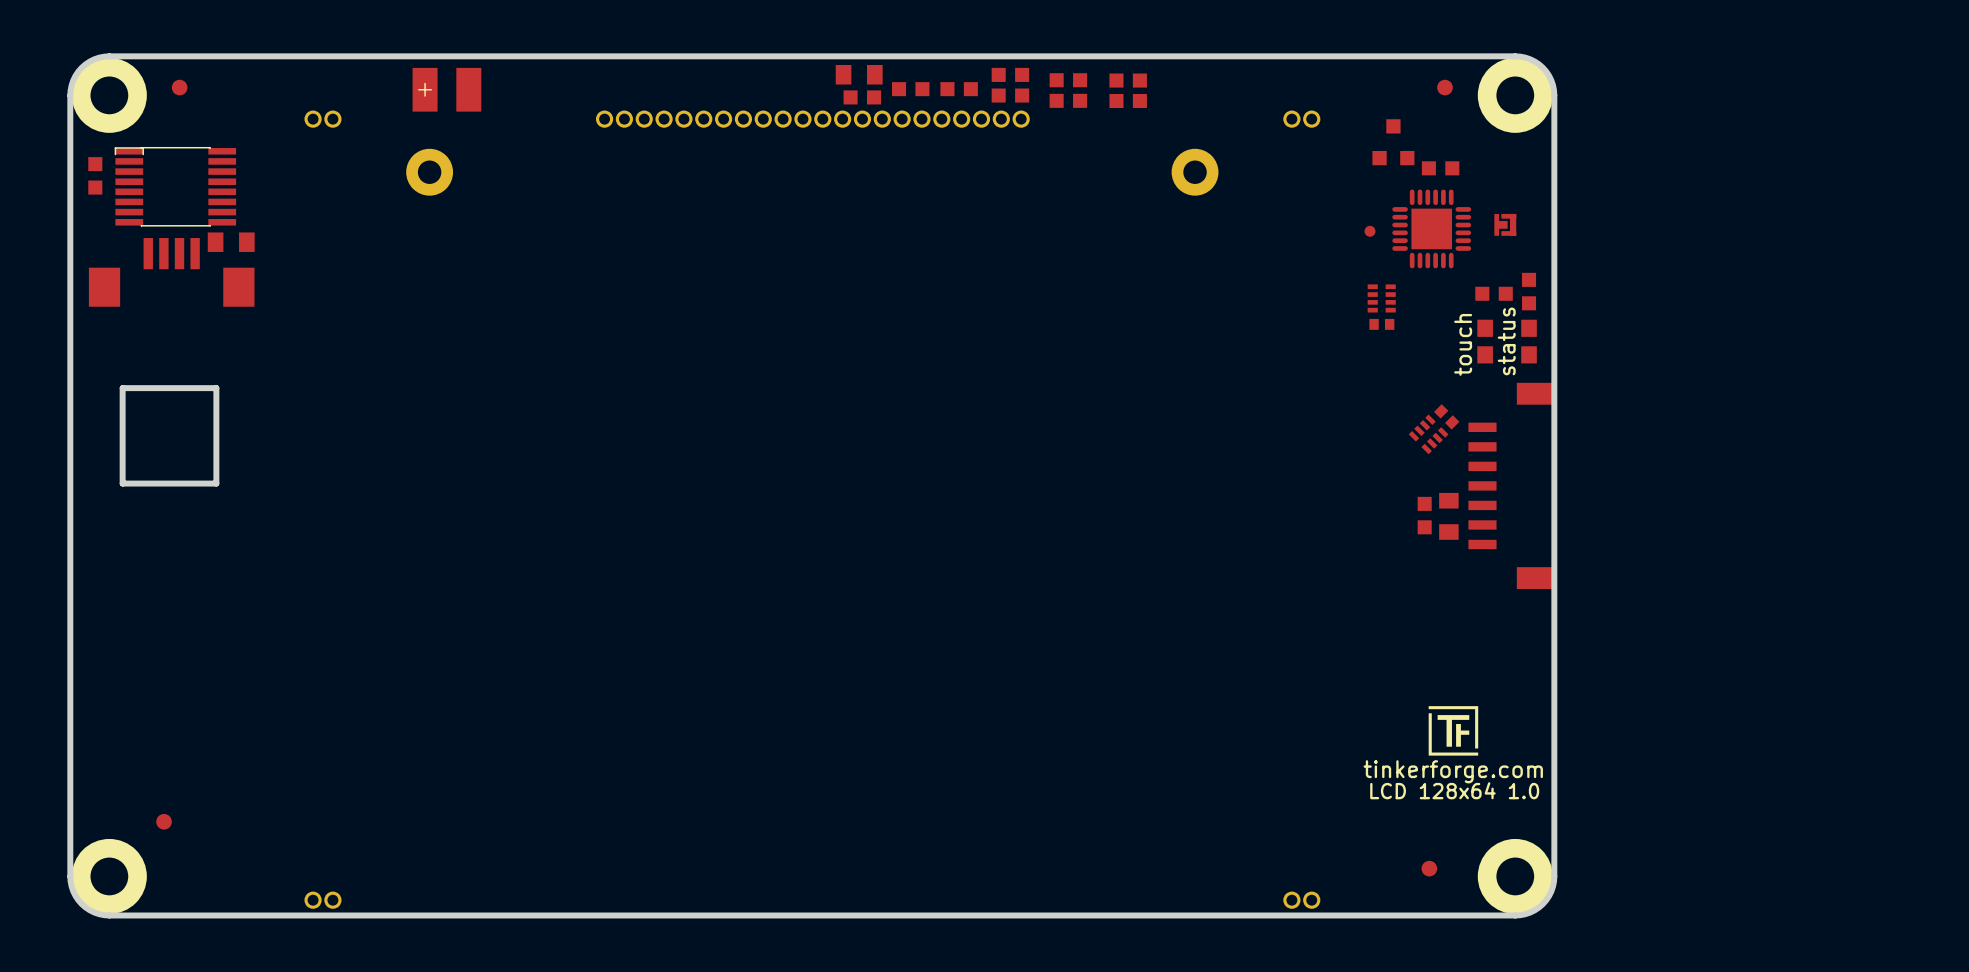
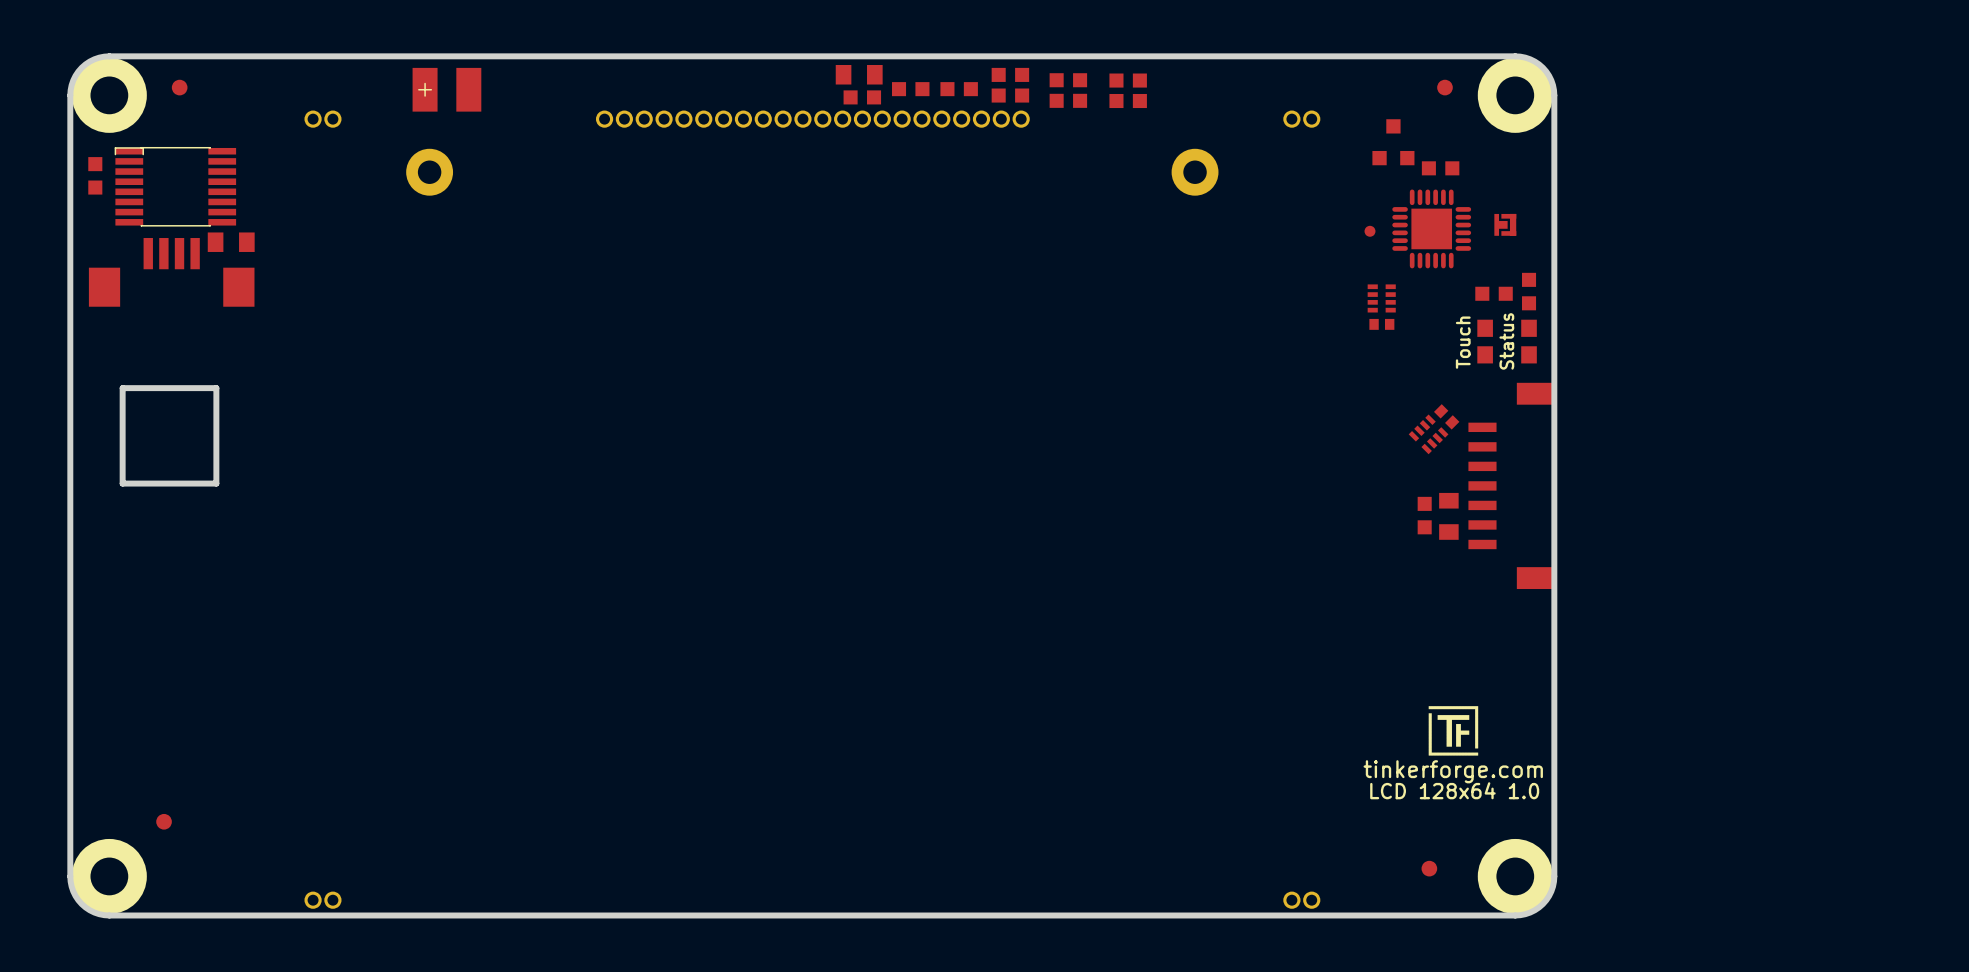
text: status (1506, 341) -> Status (1506, 341)
text: touch (1463, 344) -> Touch (1463, 342)

